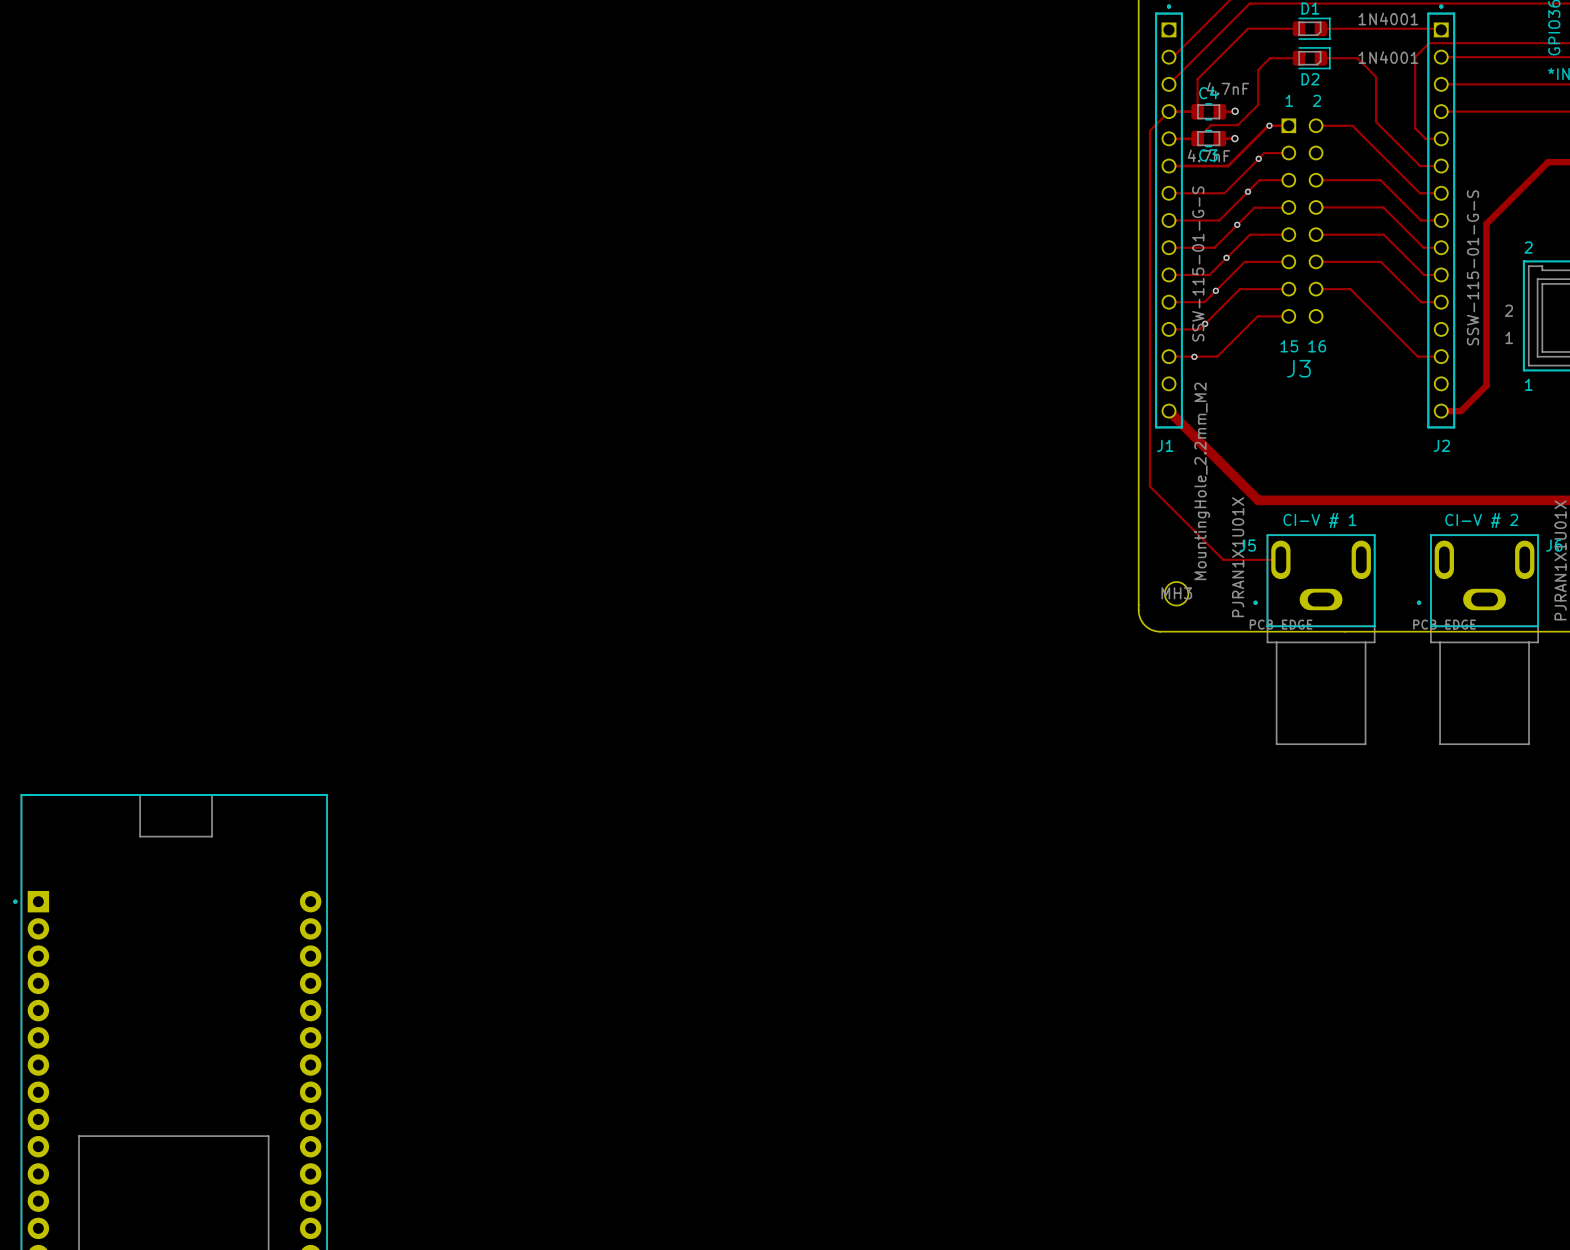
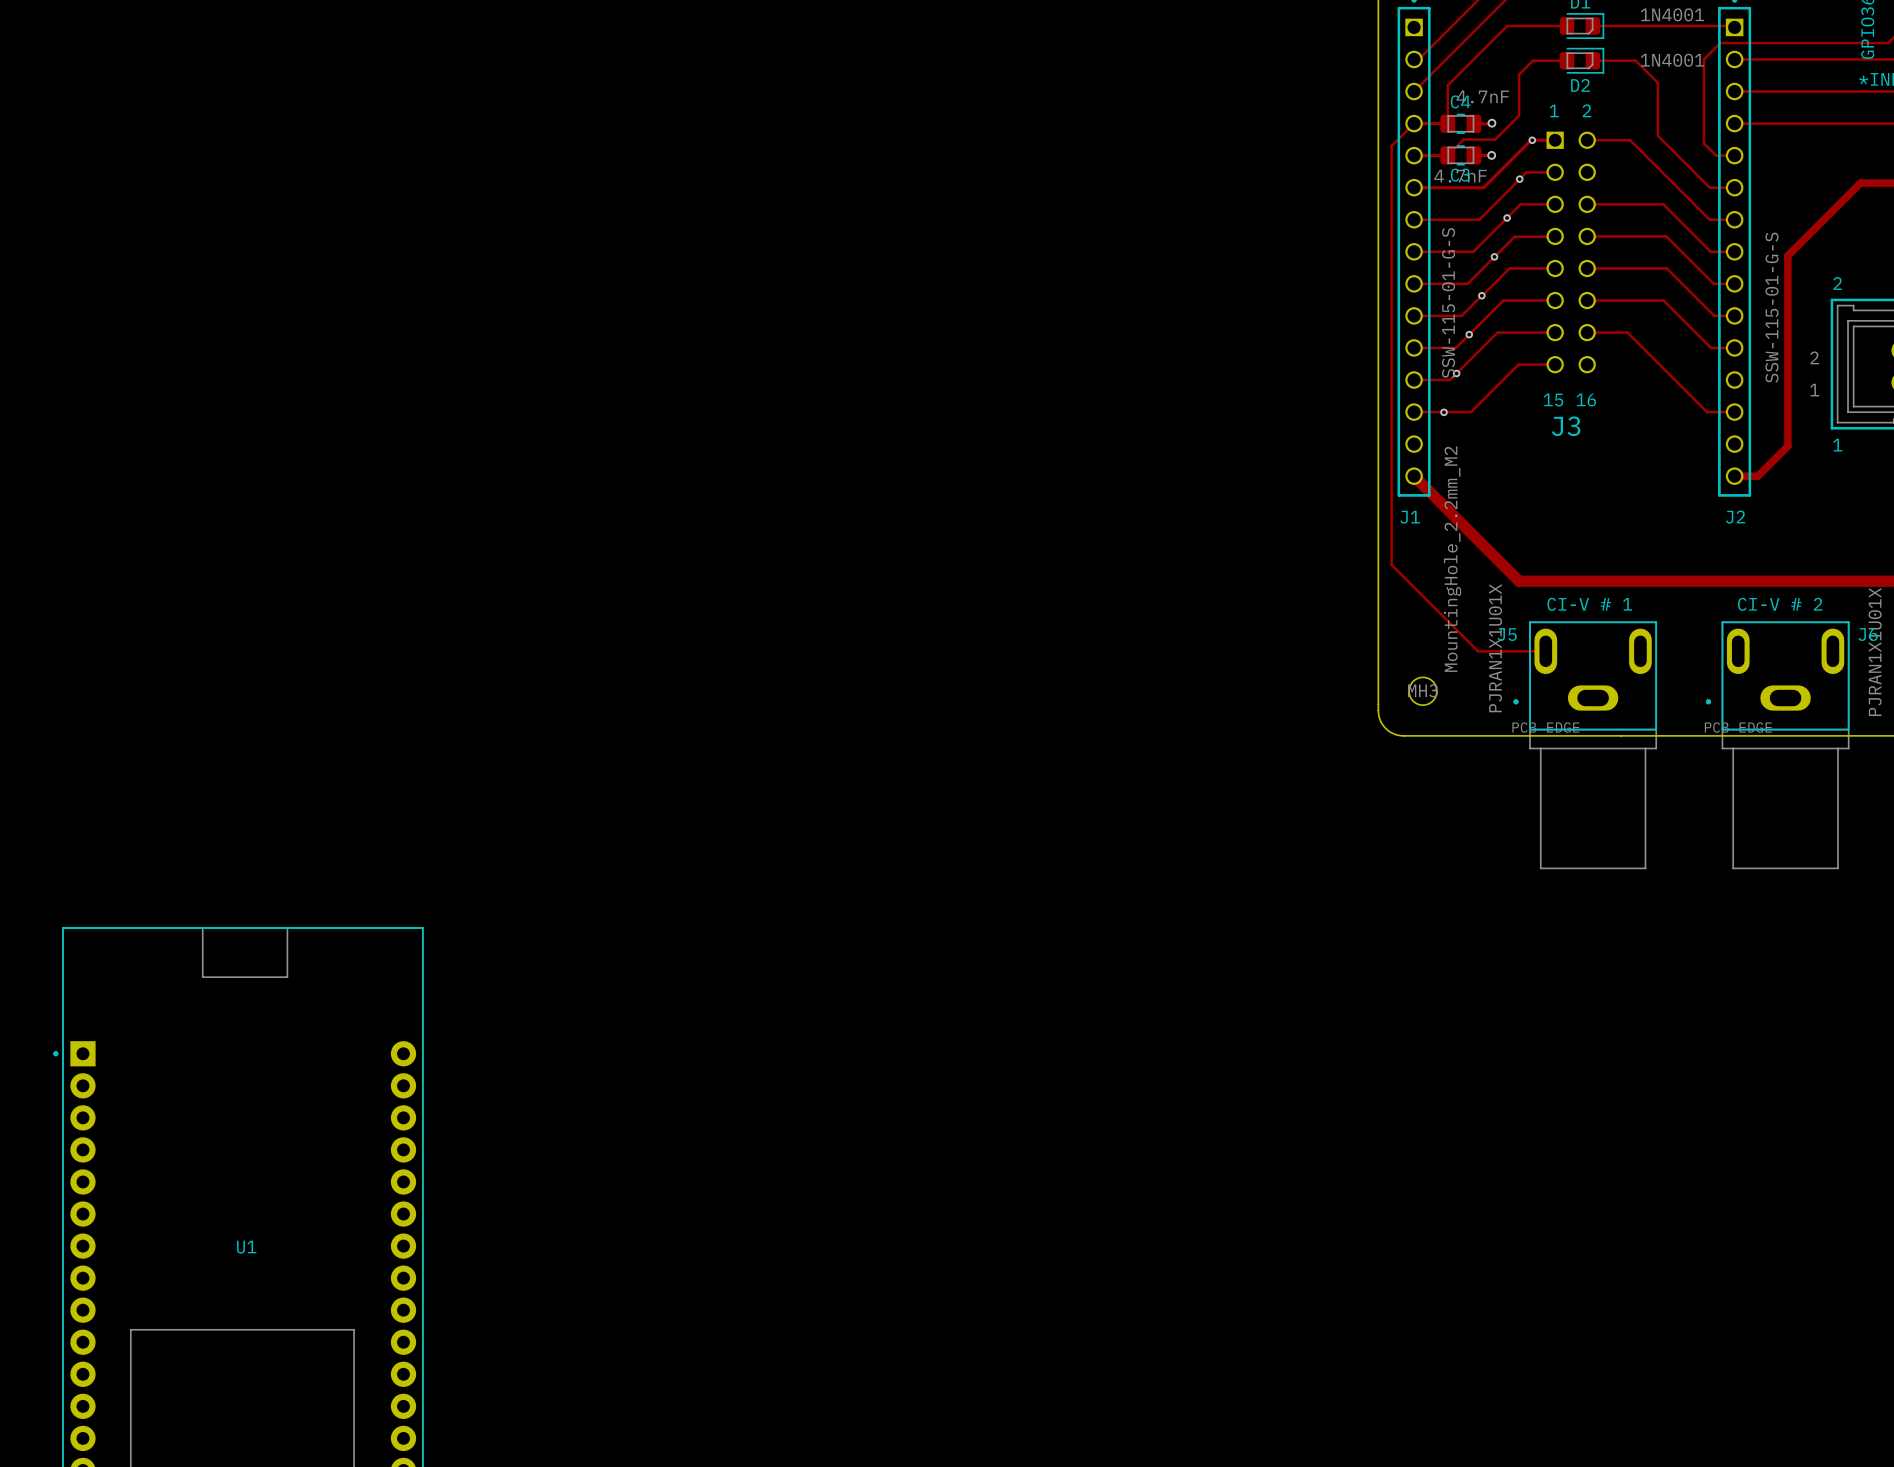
U1 name: none -> U1 (246, 1247)

